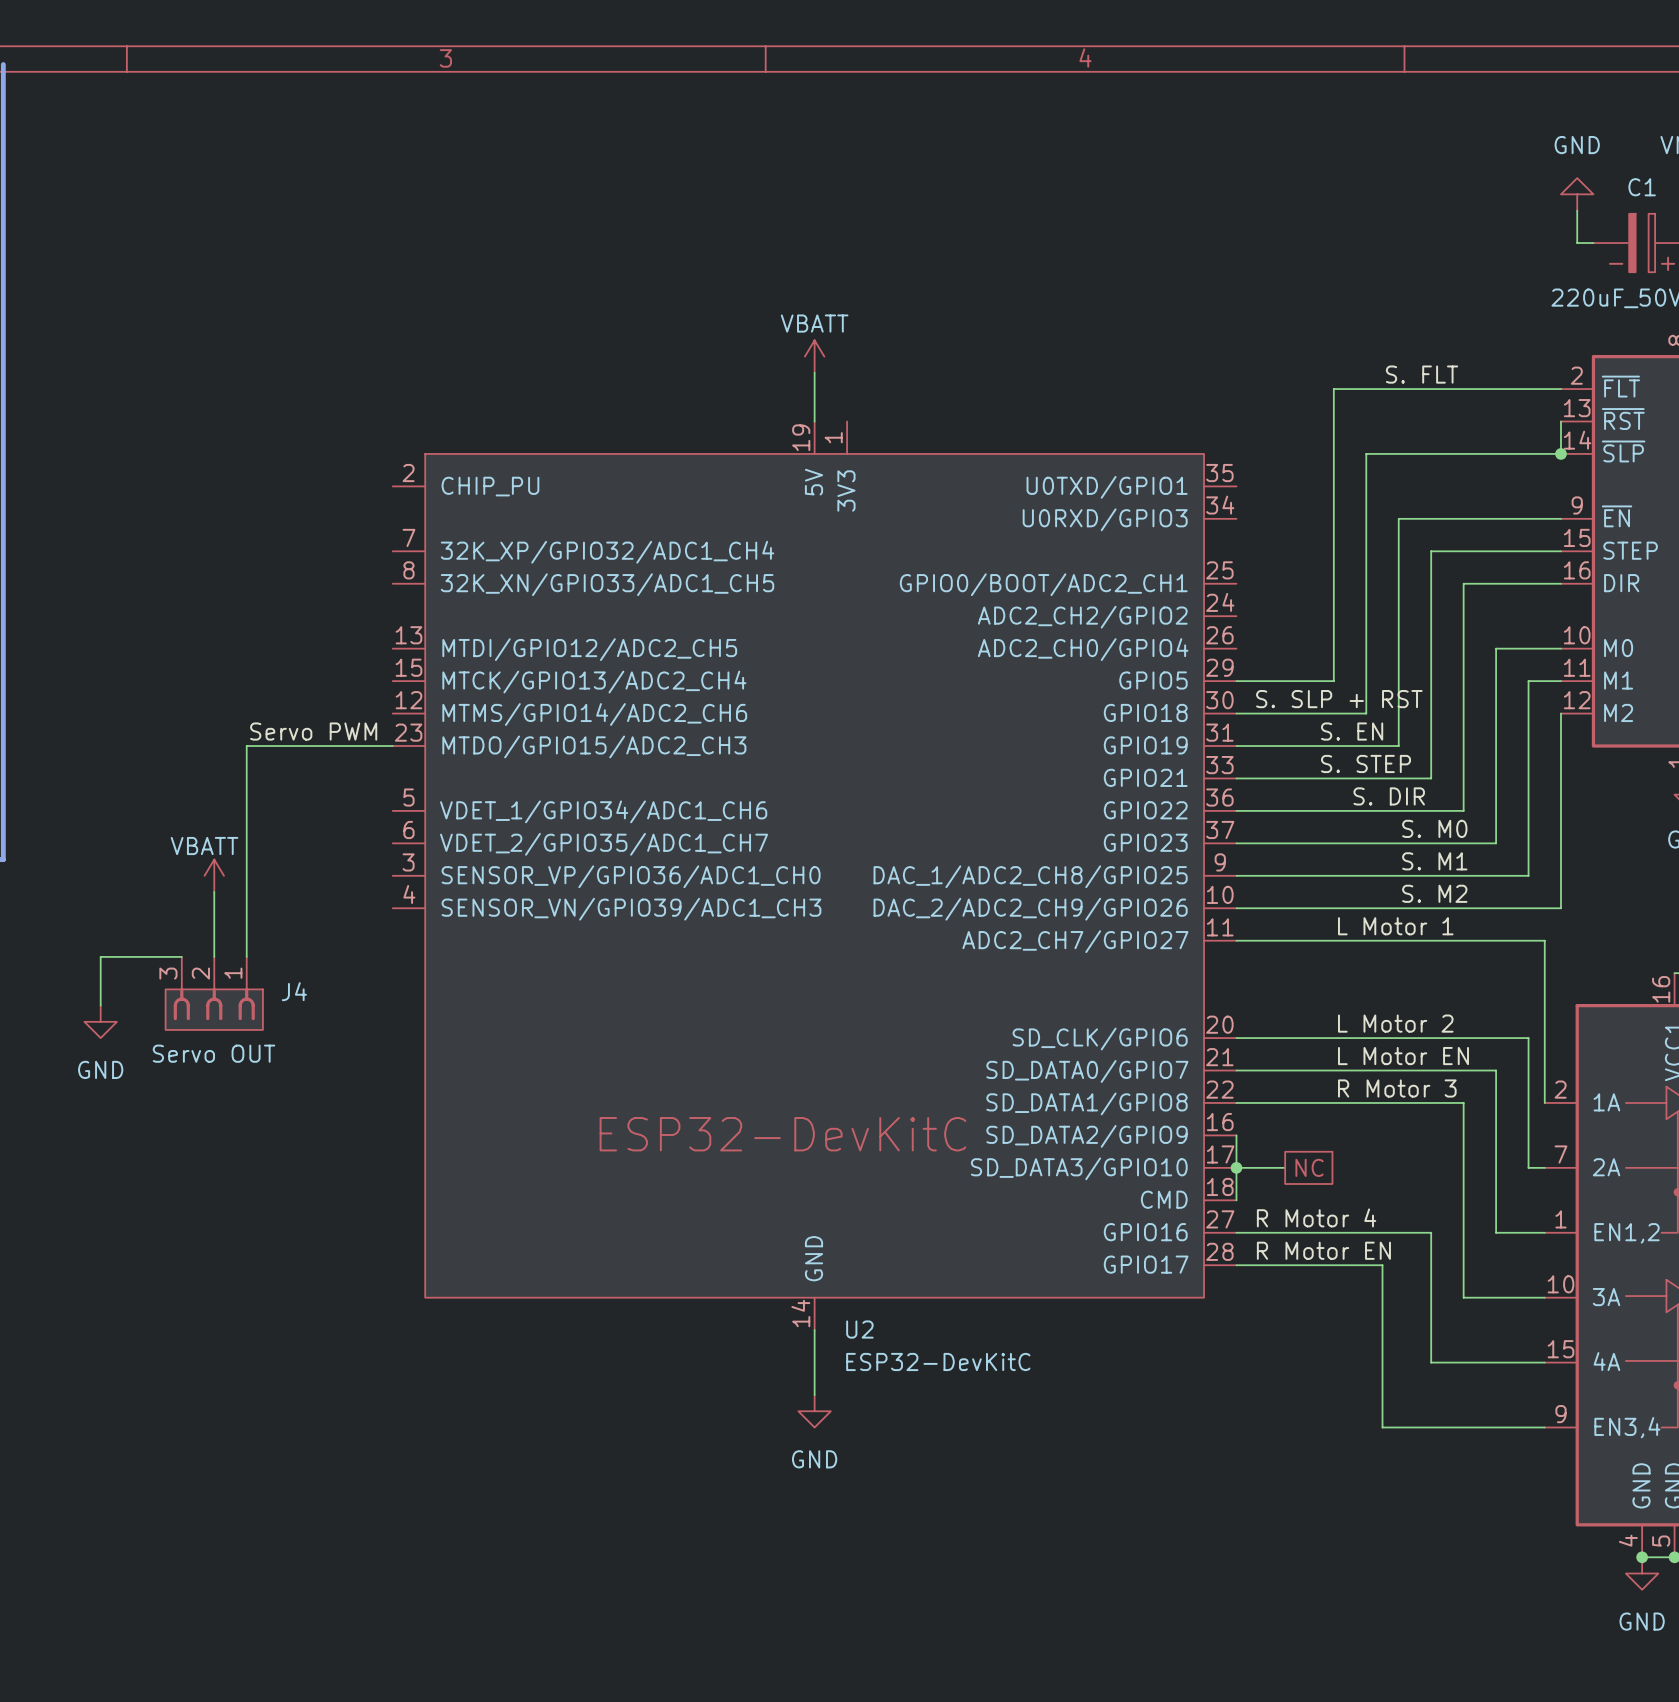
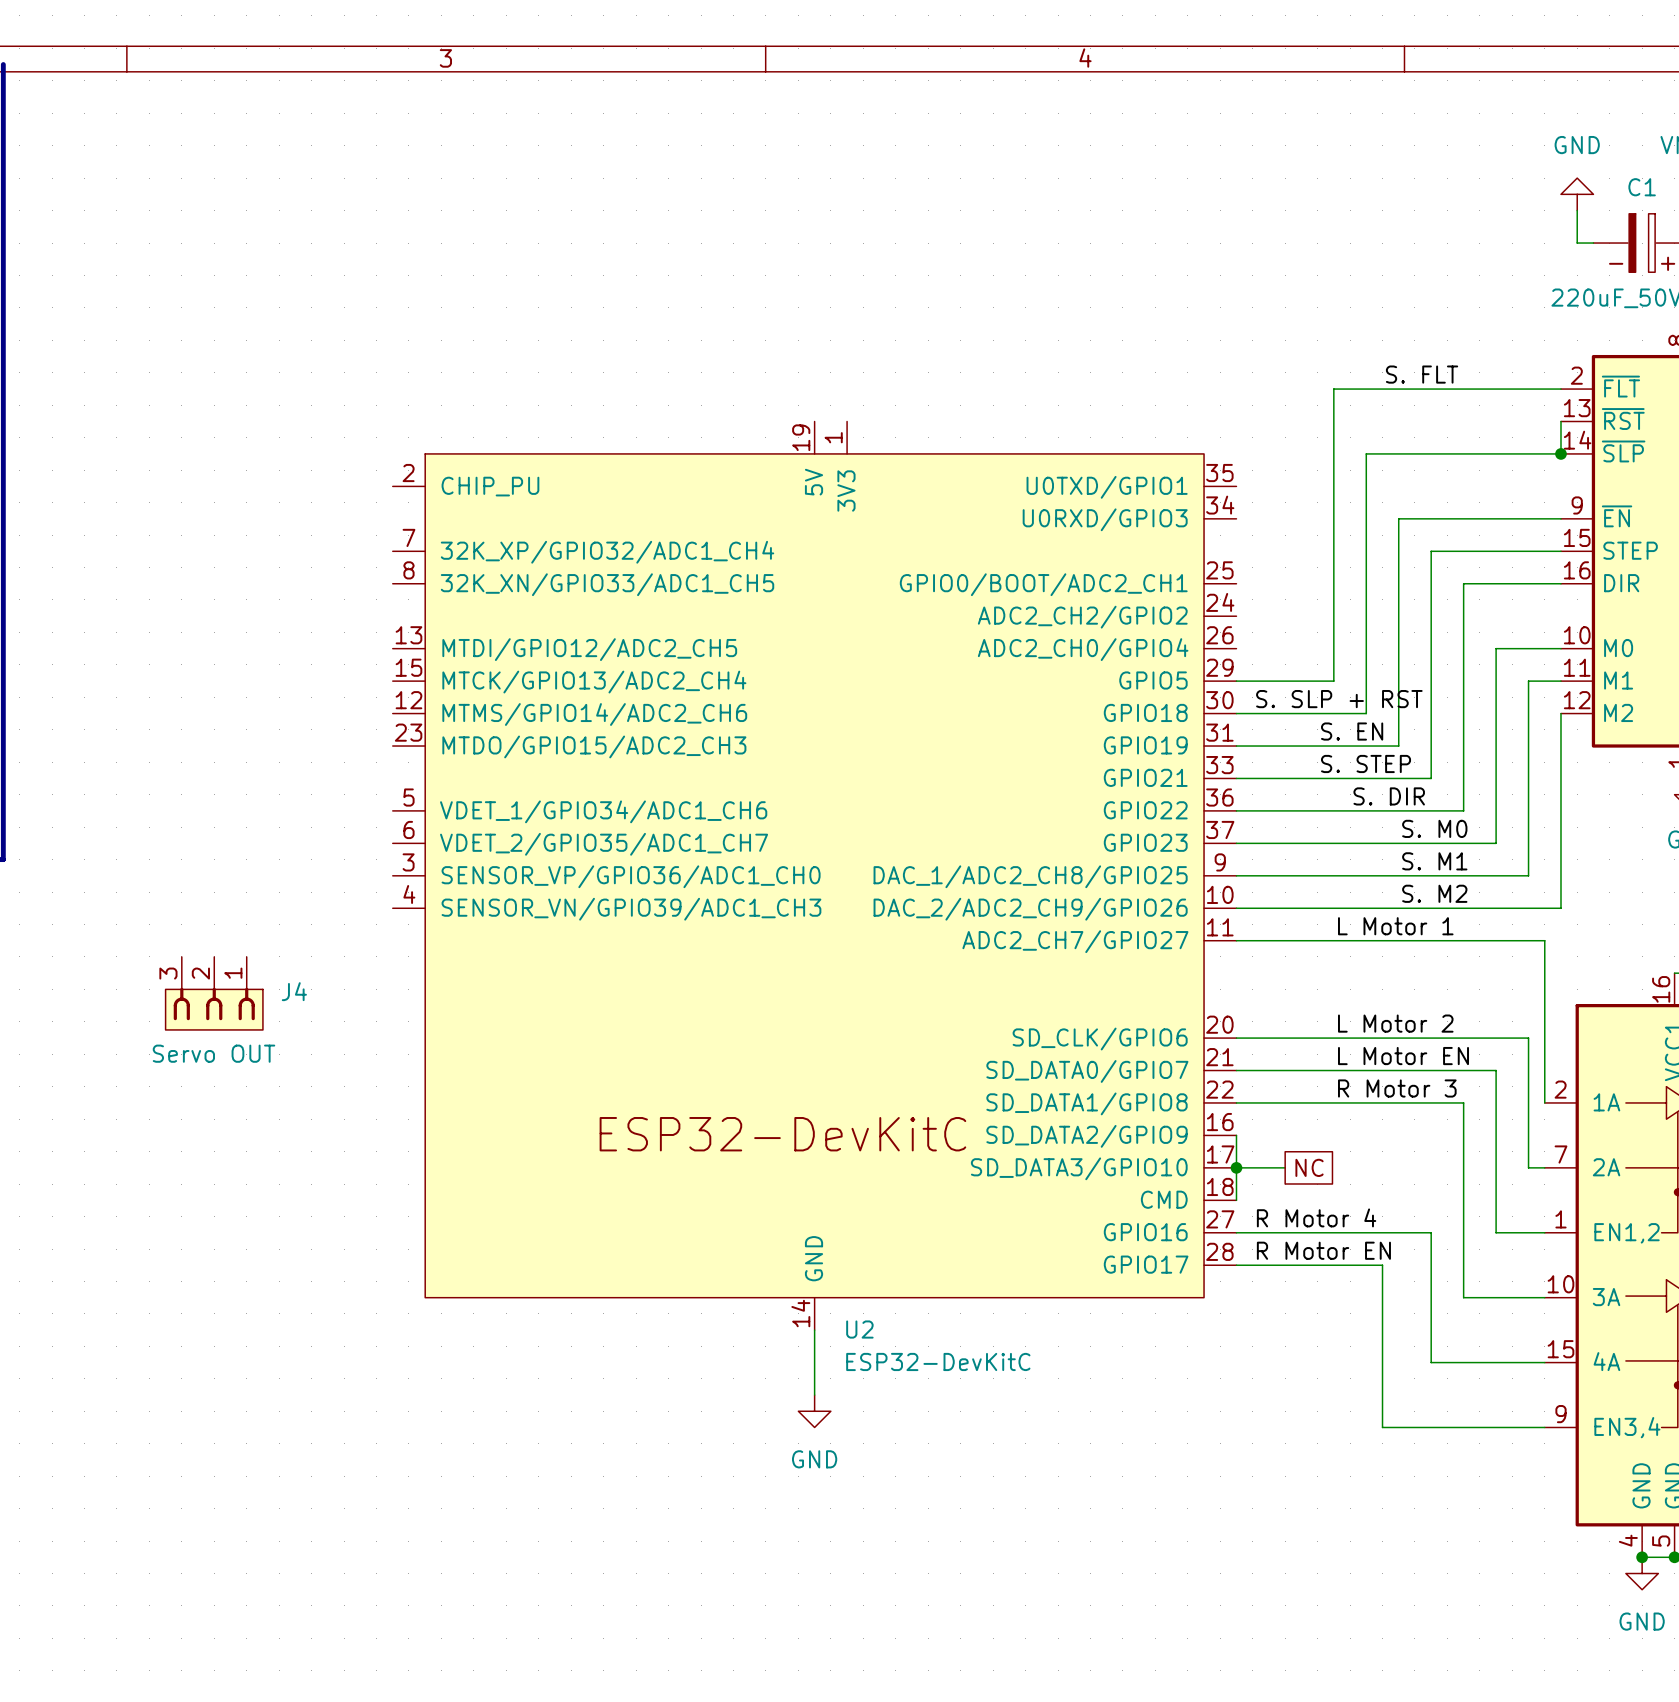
power symbol: VBATT (814, 356) -> none
wire: (814, 372) (814, 421) -> none
label: Servo PWM (313, 731) -> none
wire: (392, 746) (246, 746) (246, 956) -> none
power symbol: VBATT (214, 875) -> none
wire: (214, 892) (214, 956) -> none
wire: (181, 956) (100, 956) (100, 1005) -> none
power symbol: GND (100, 1021) -> none

